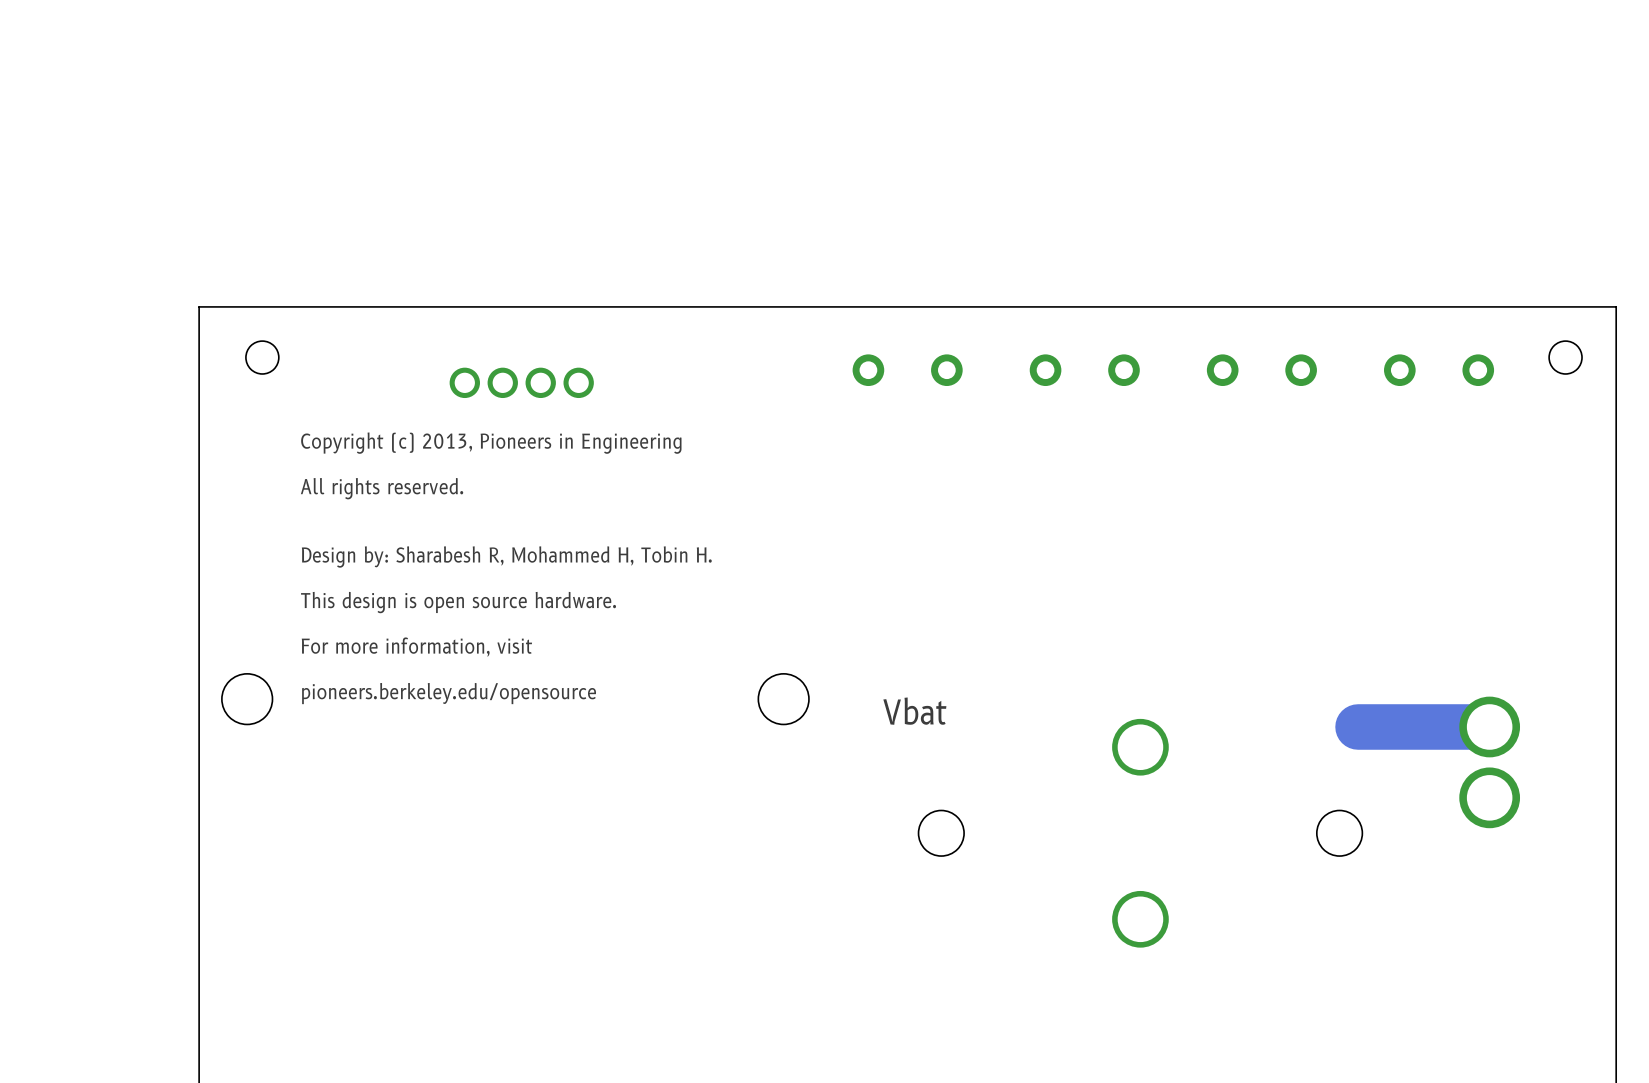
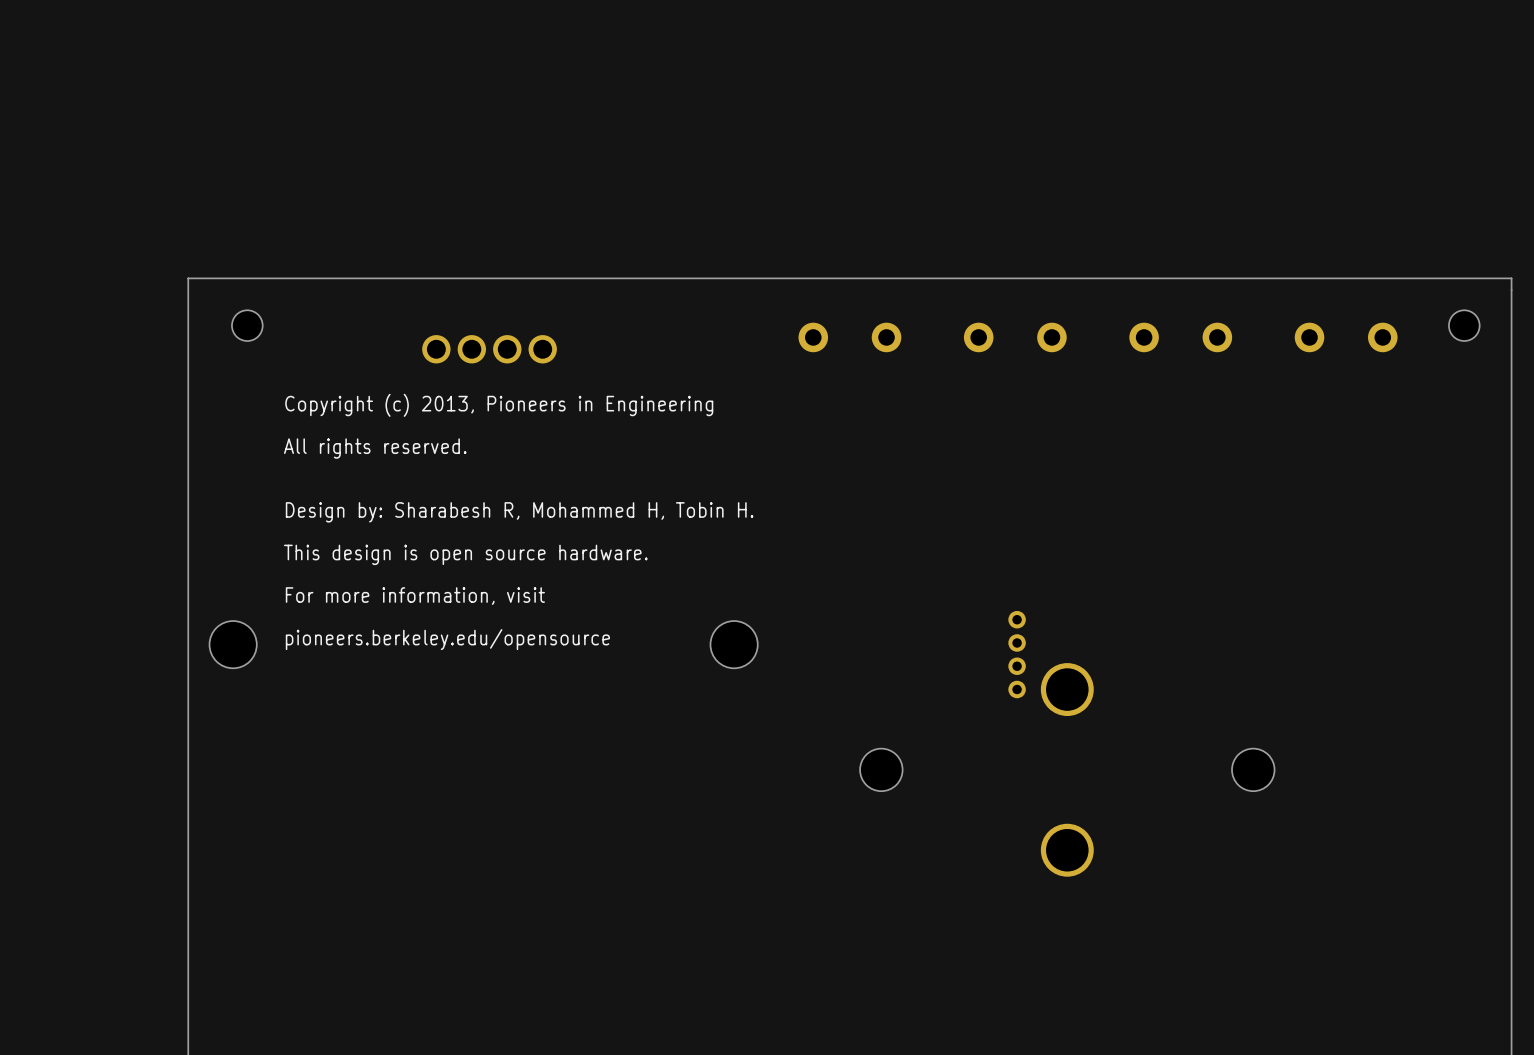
part: none -> (1017, 654)
text: Vbat (914, 711) -> none
track: (1492, 726) (1358, 726) -> none
part: (1489, 762) -> none

